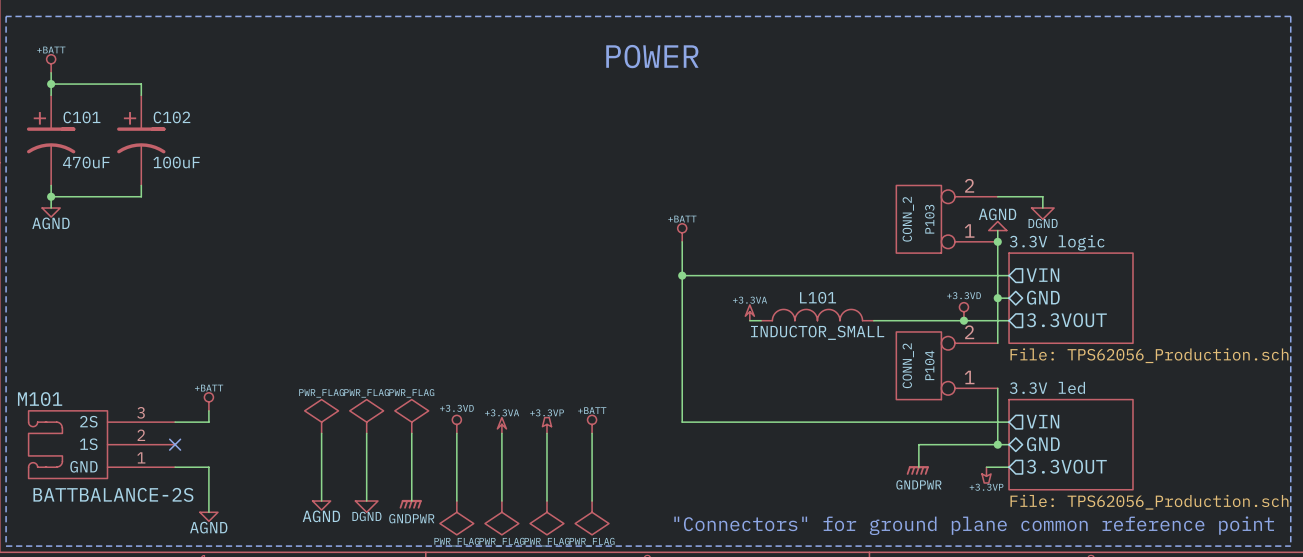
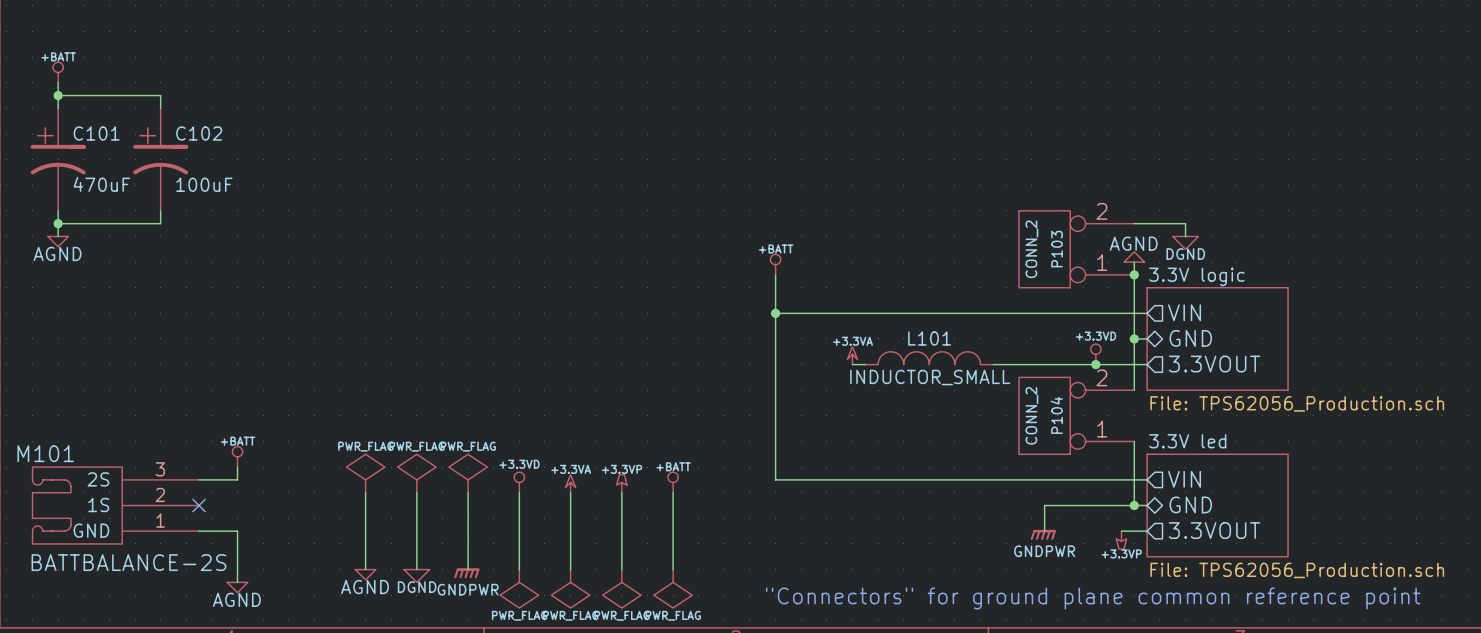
line: (6, 16) (1290, 16) (1290, 546) (6, 546) (6, 16) -> none
text: POWER (652, 56) -> none

